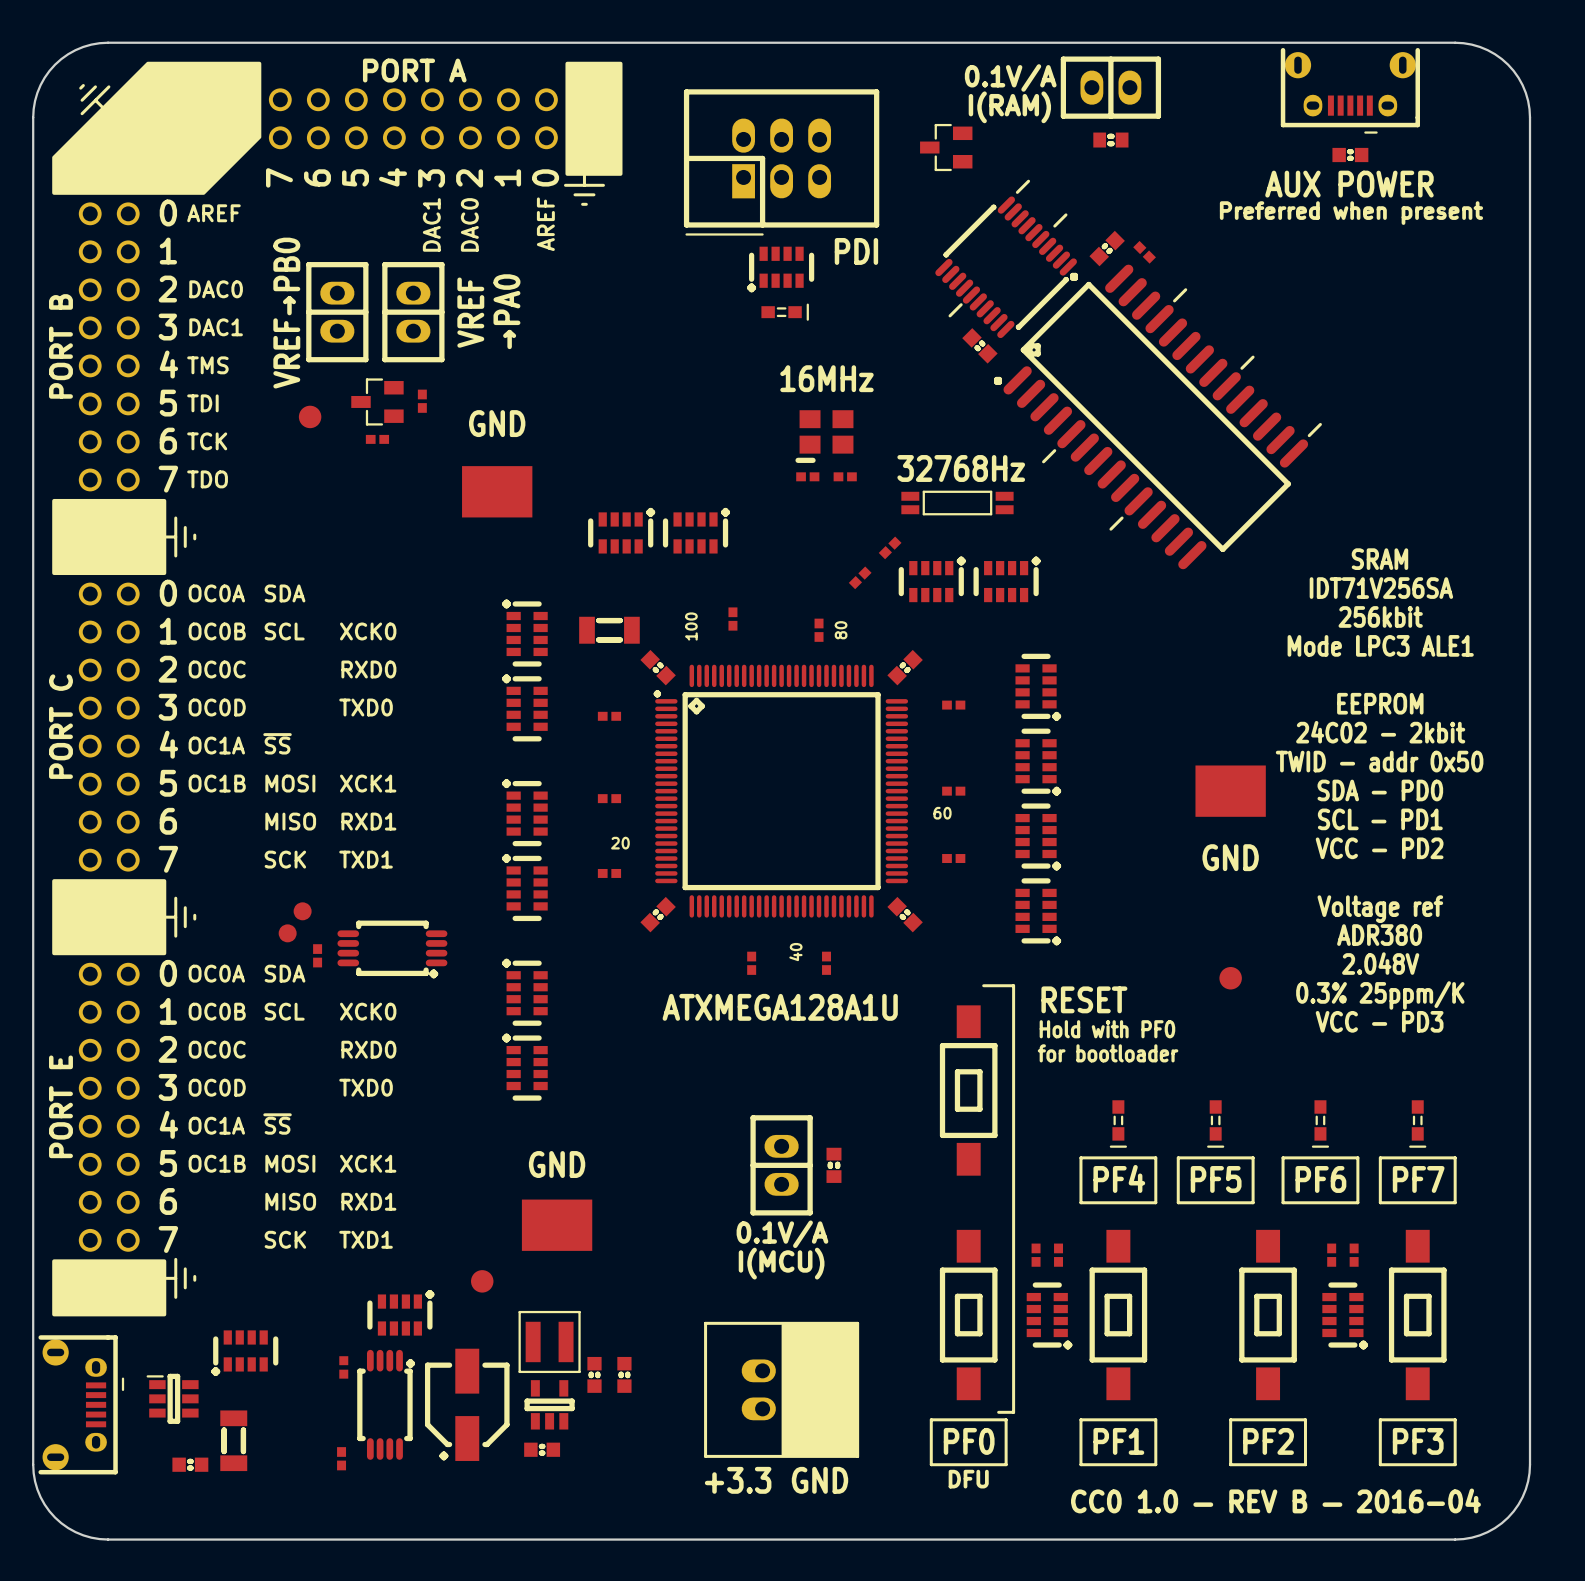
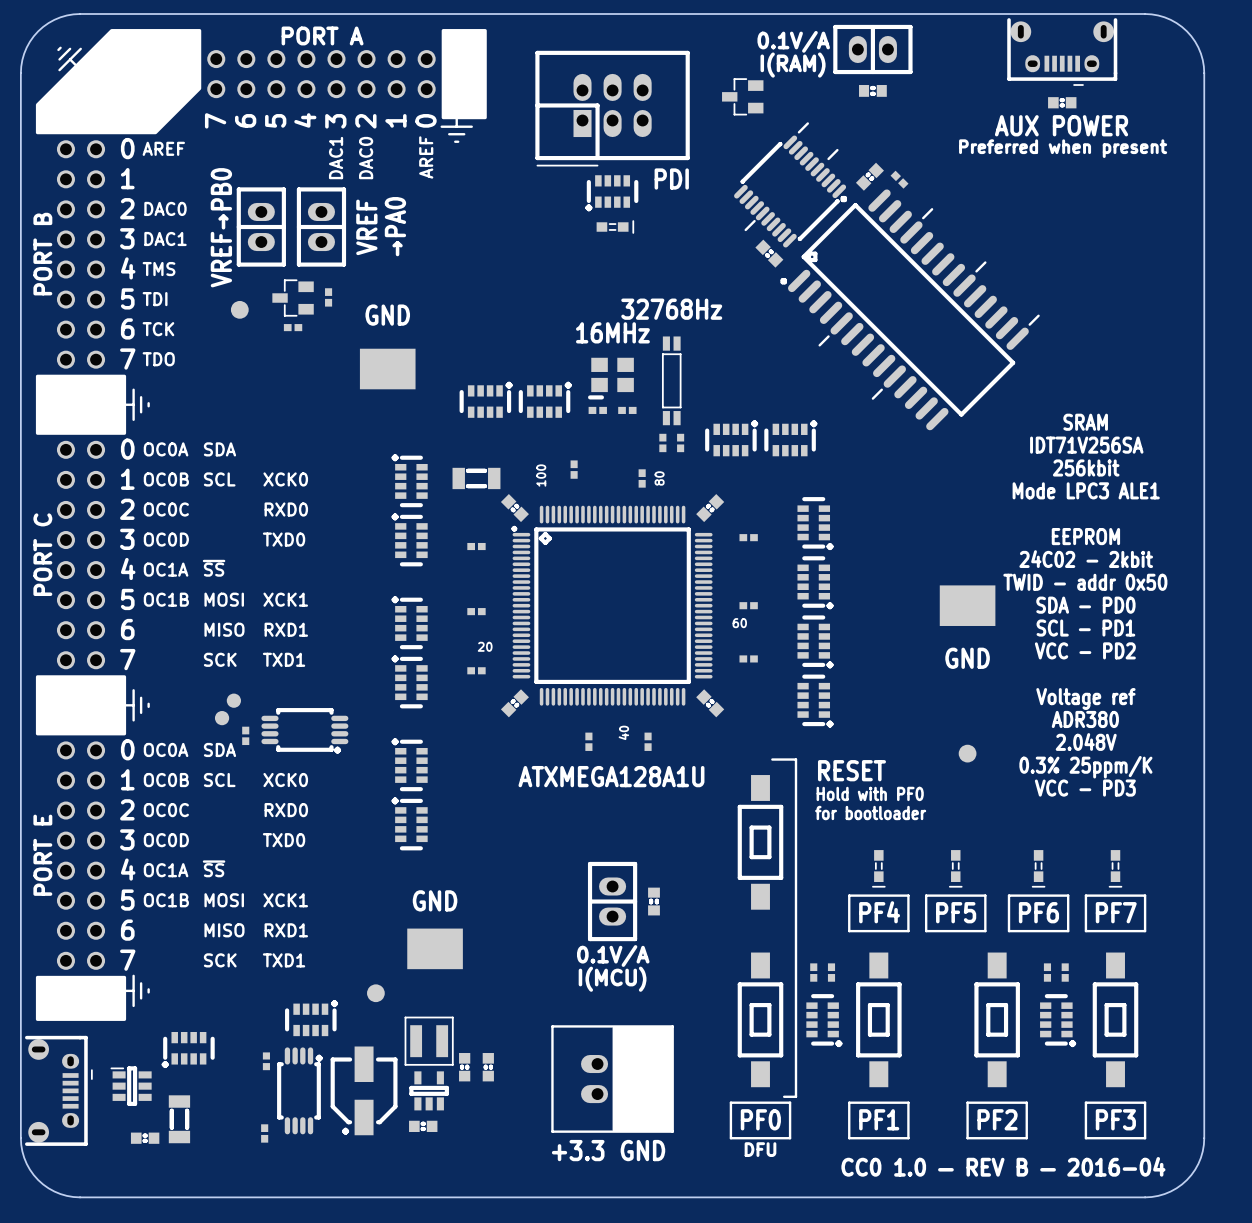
part position: (824, 436) -> (610, 378)
text position: 32768Hz (961, 468) -> 32768Hz (671, 309)
part: (807, 476) -> none
part: (845, 476) -> none
part rotation: 0° (957, 503) -> 90° clockwise (671, 380)
part position: (957, 503) -> (671, 380)
part: none -> (597, 410)
part: none -> (627, 410)
part: (890, 547) -> none
part: (860, 577) -> none
part: none -> (662, 442)
part: none -> (680, 442)

